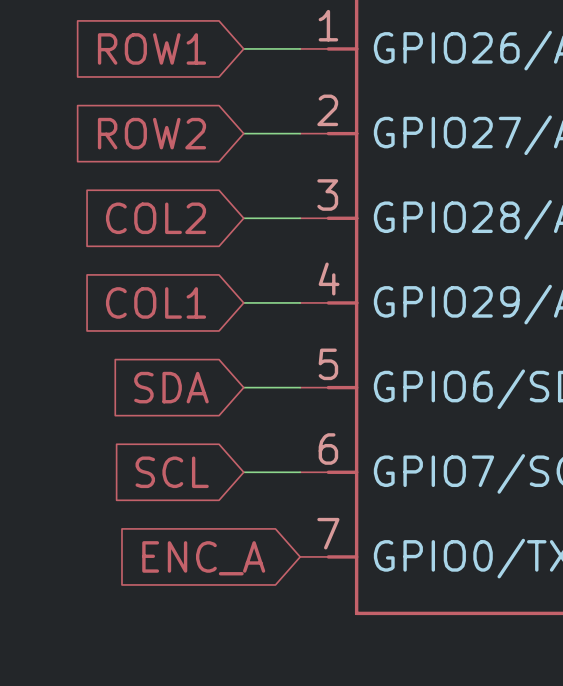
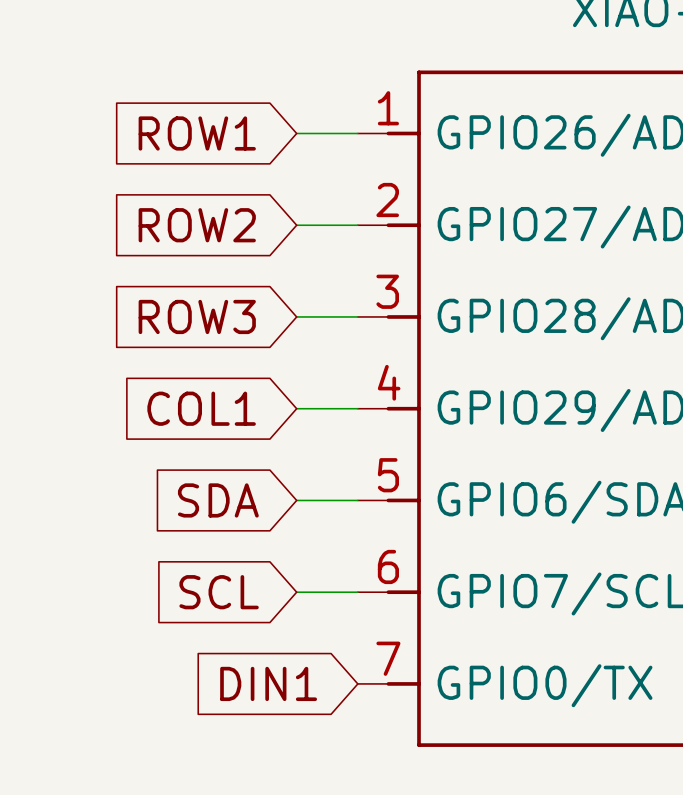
global label: COL2 (156, 218) -> ROW3 (197, 316)
global label: ENC_A (203, 558) -> DIN1 (268, 683)

